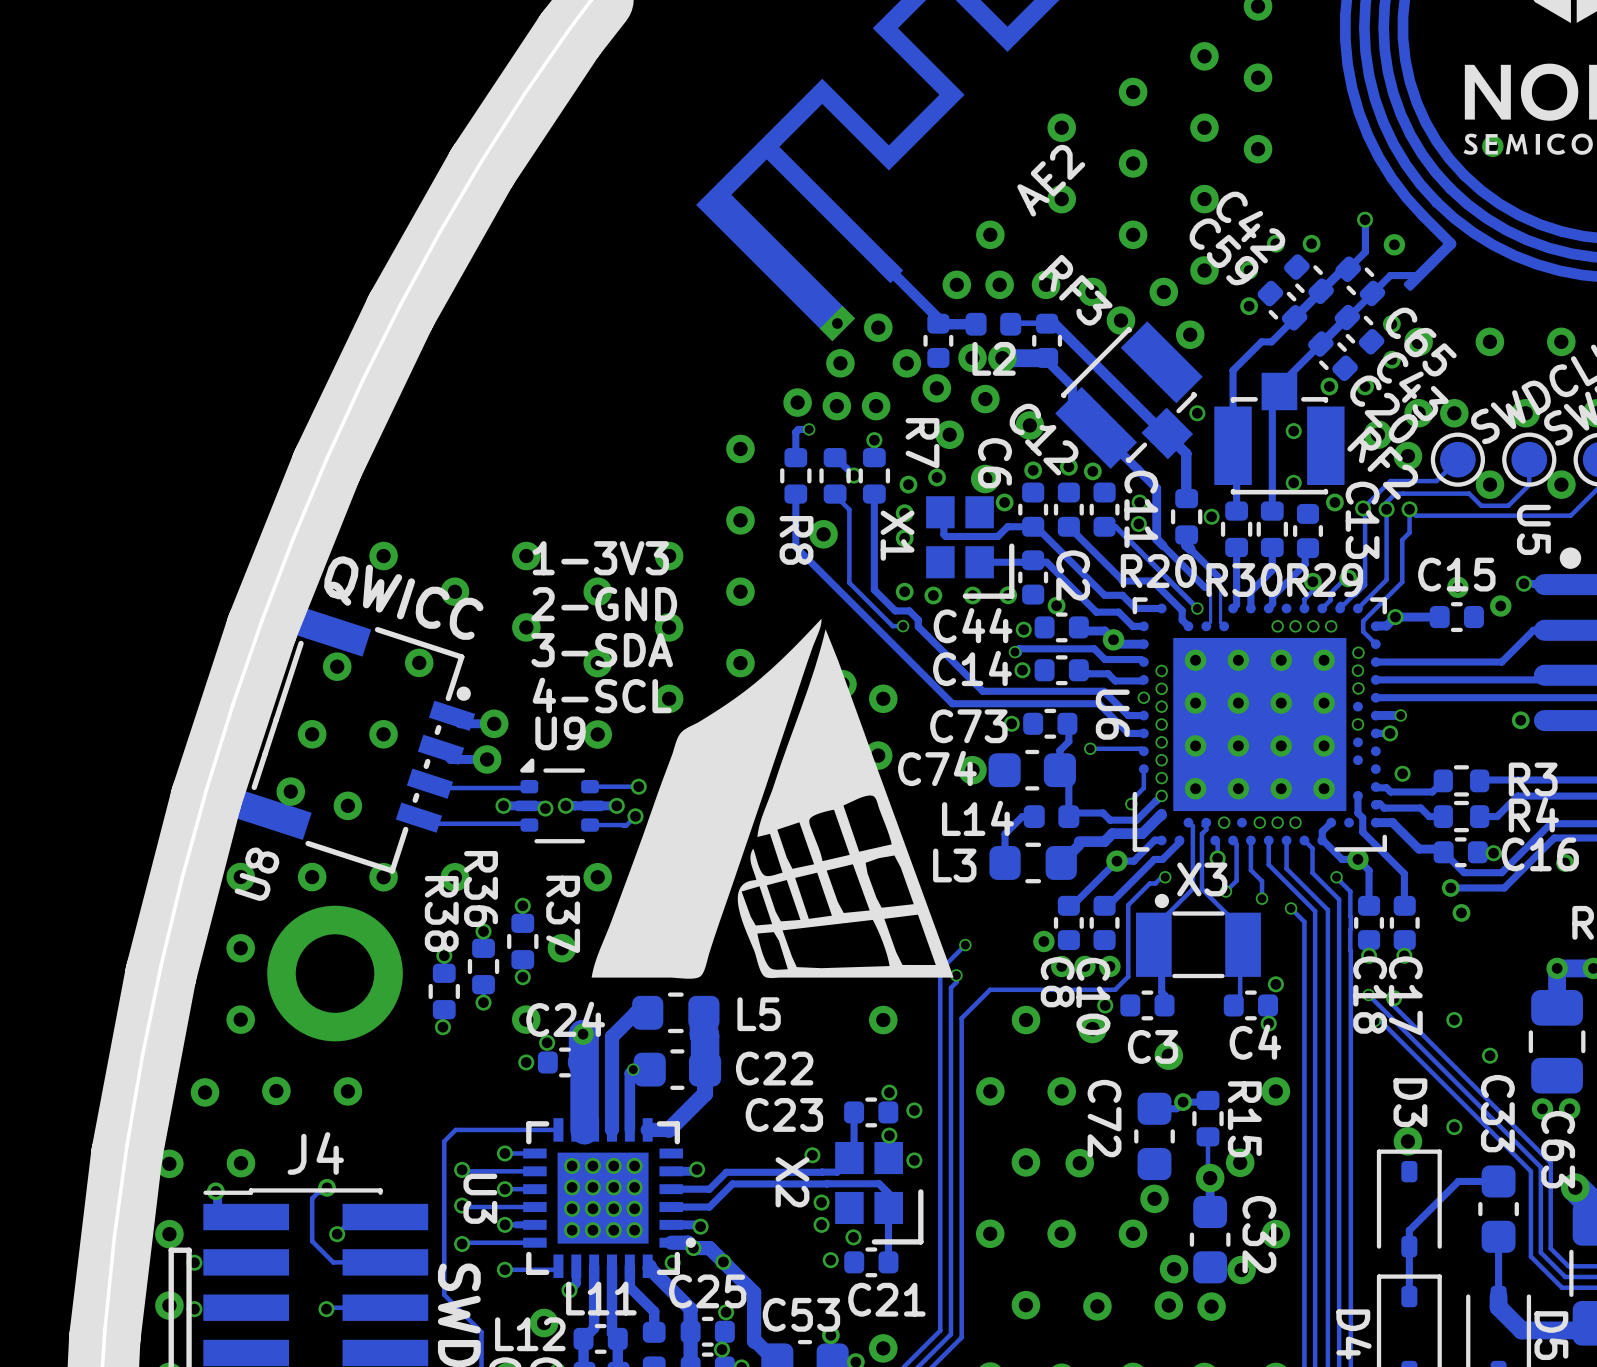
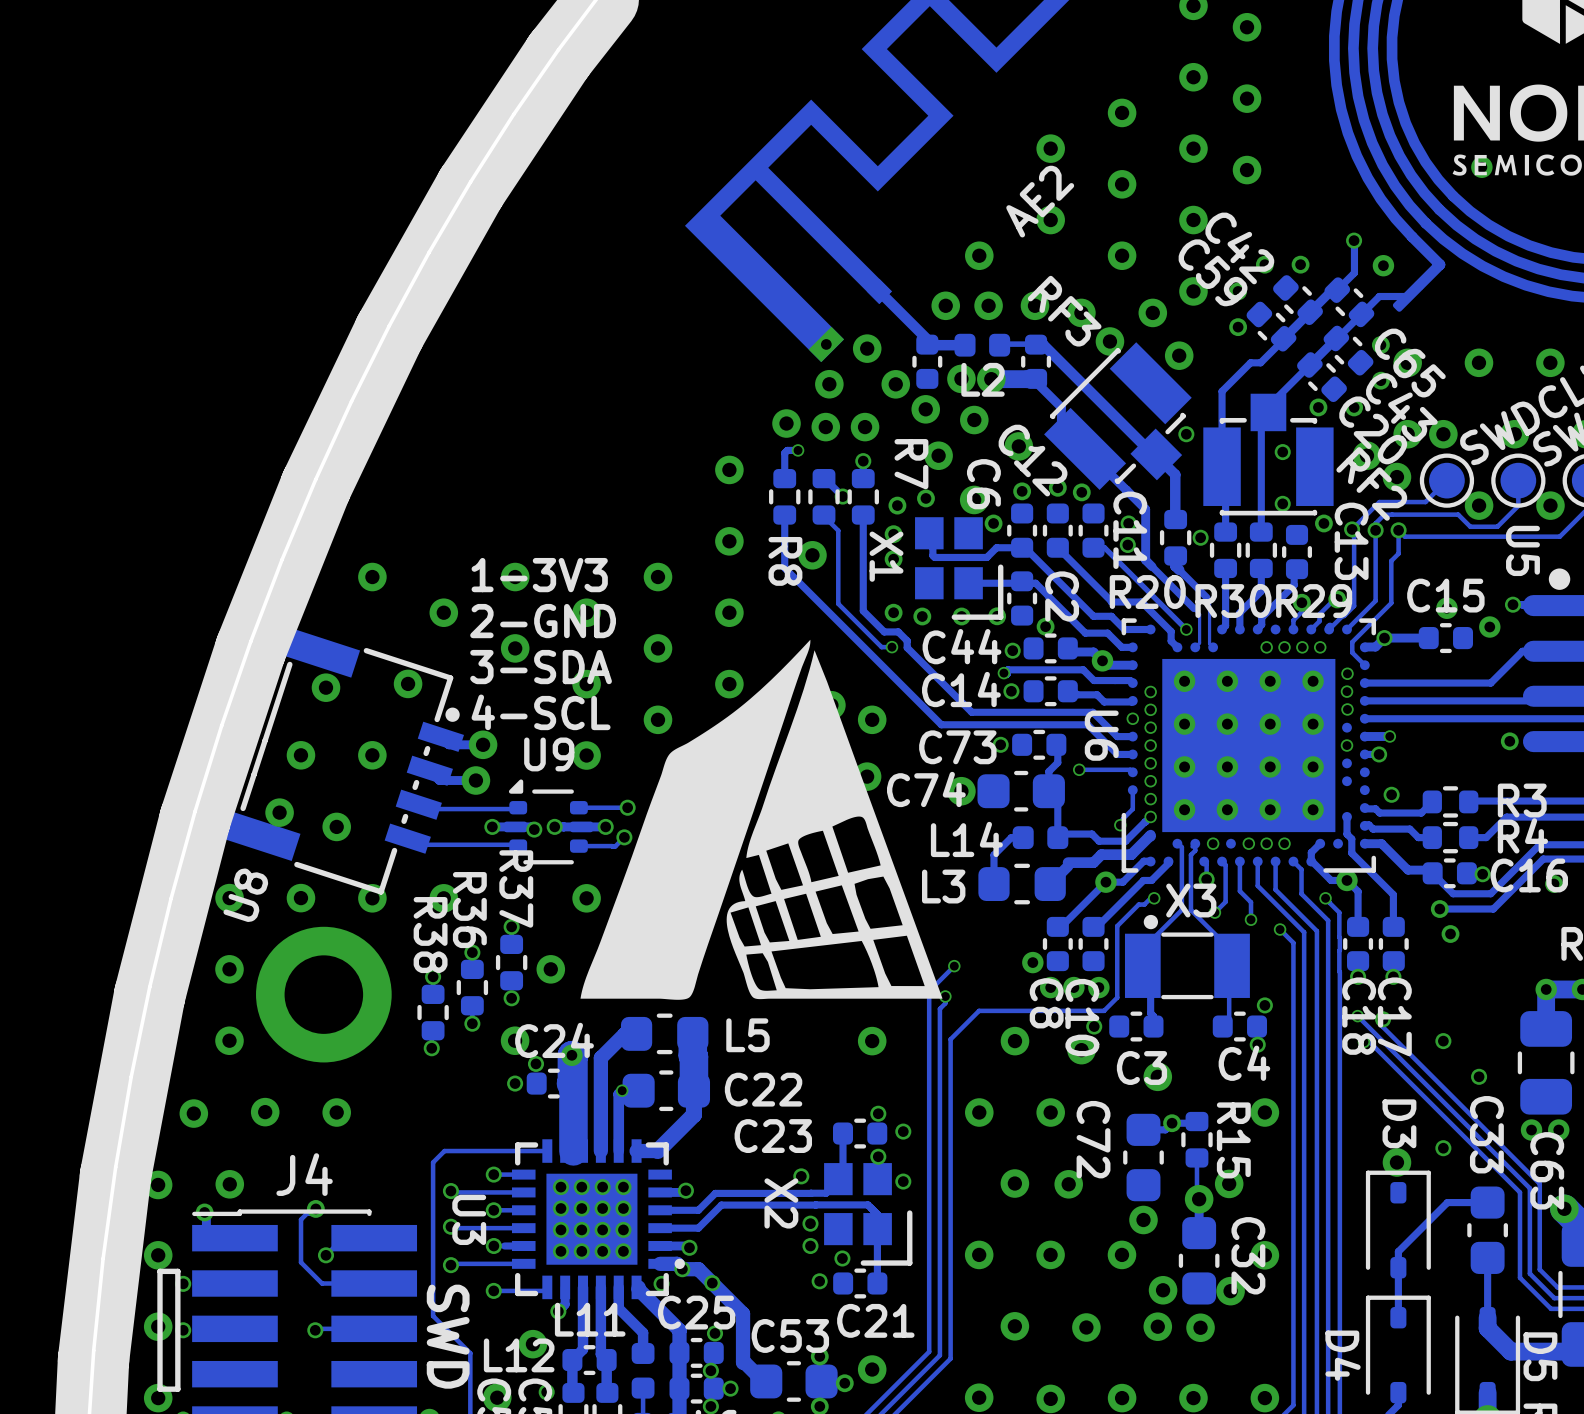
text position: 1-3V3 (600, 558) -> 1-3V3 (539, 575)
text: QWICC (403, 598) -> none
text position: 2-GND (604, 604) -> 2-GND (543, 621)
text position: 3-SDA (602, 650) -> 3-SDA (541, 667)
text position: 4-SCL (602, 695) -> 4-SCL (541, 712)
R37 name position: R37 (563, 914) -> R37 (516, 888)

